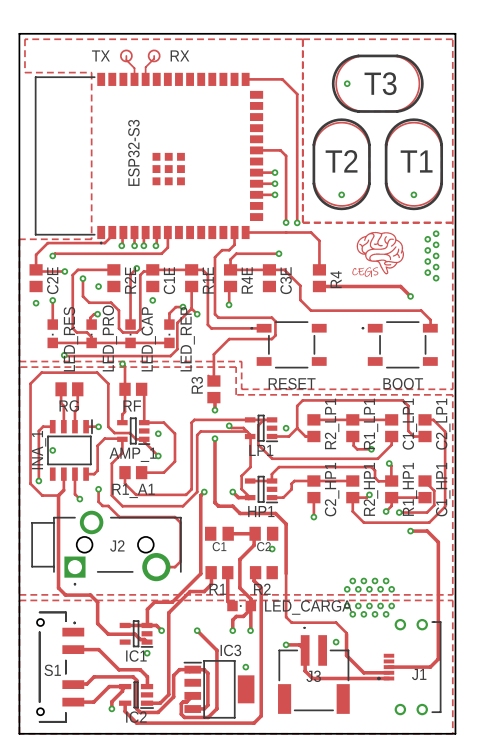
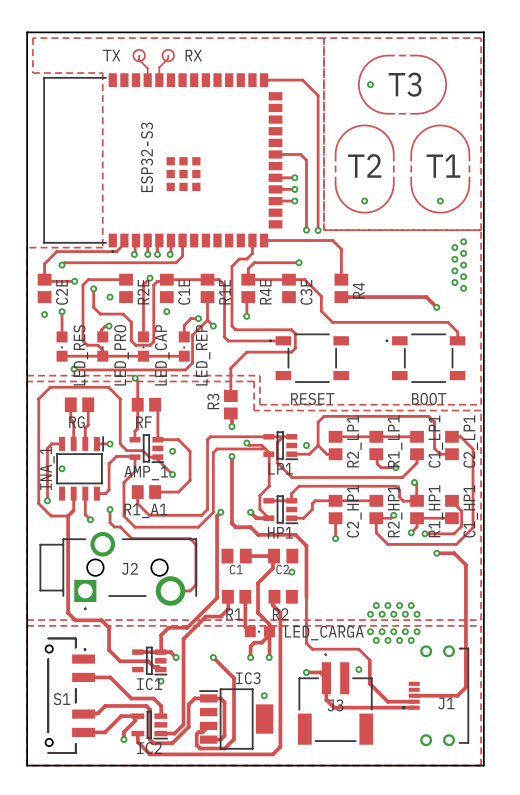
line: (358, 55) (397, 55) (409, 60) (417, 67) (422, 80) (421, 90) (417, 99) (409, 106) (397, 111) (358, 111) (345, 106) (335, 93) (334, 76) (342, 62) (358, 55) -> none
line: (313, 144) (313, 183) (318, 196) (325, 203) (338, 208) (348, 208) (357, 203) (364, 196) (369, 183) (369, 144) (364, 132) (351, 121) (334, 120) (320, 129) (313, 144) -> none
line: (386, 144) (386, 183) (390, 196) (397, 203) (410, 208) (420, 208) (429, 203) (437, 196) (441, 183) (441, 144) (437, 132) (423, 121) (407, 120) (392, 129) (386, 144) -> none
drawing: [352, 231, 404, 278] -> none

